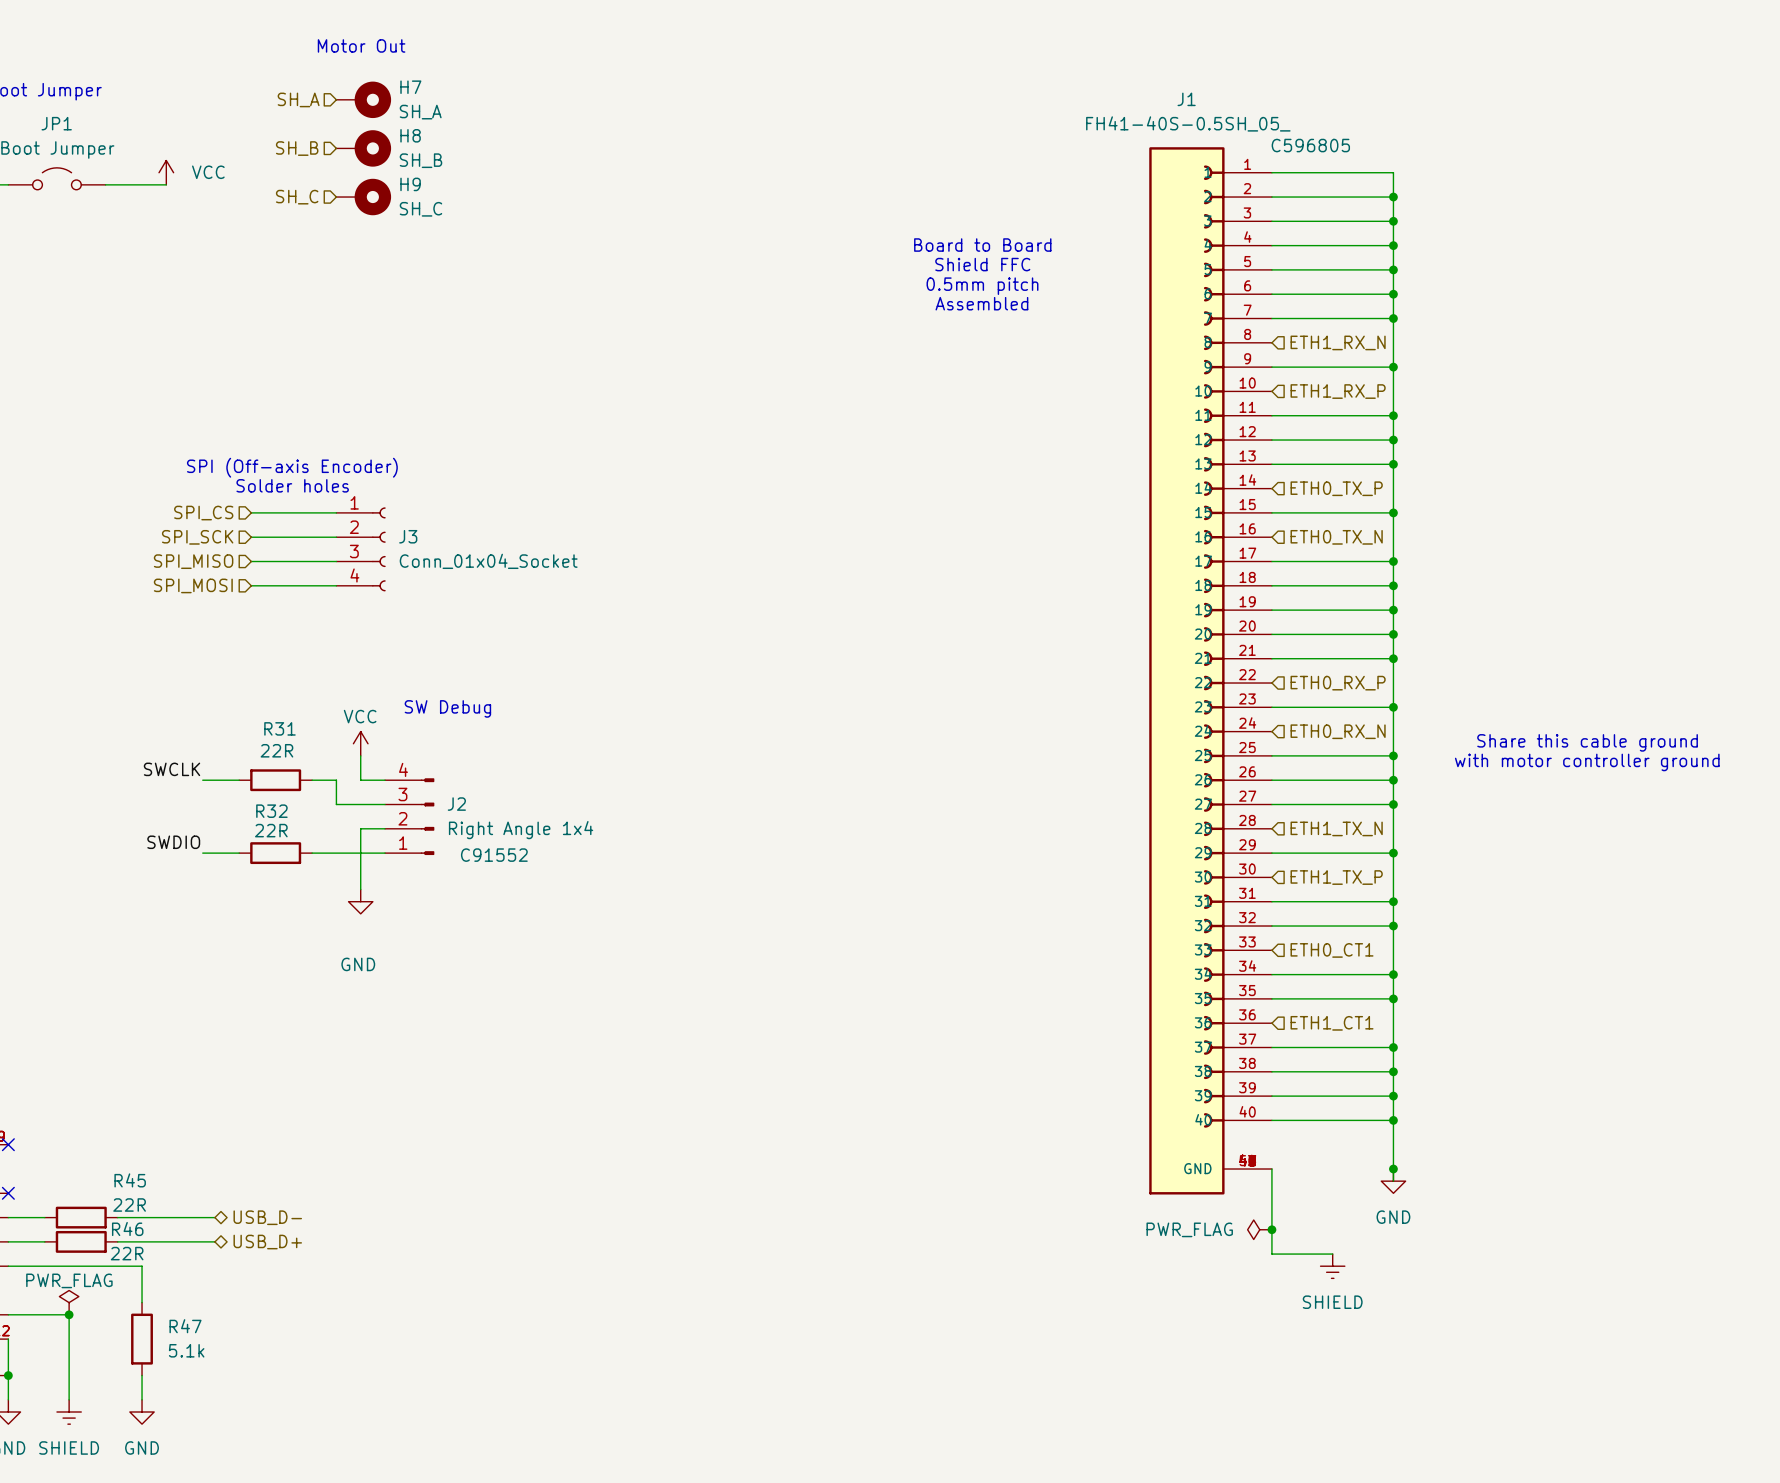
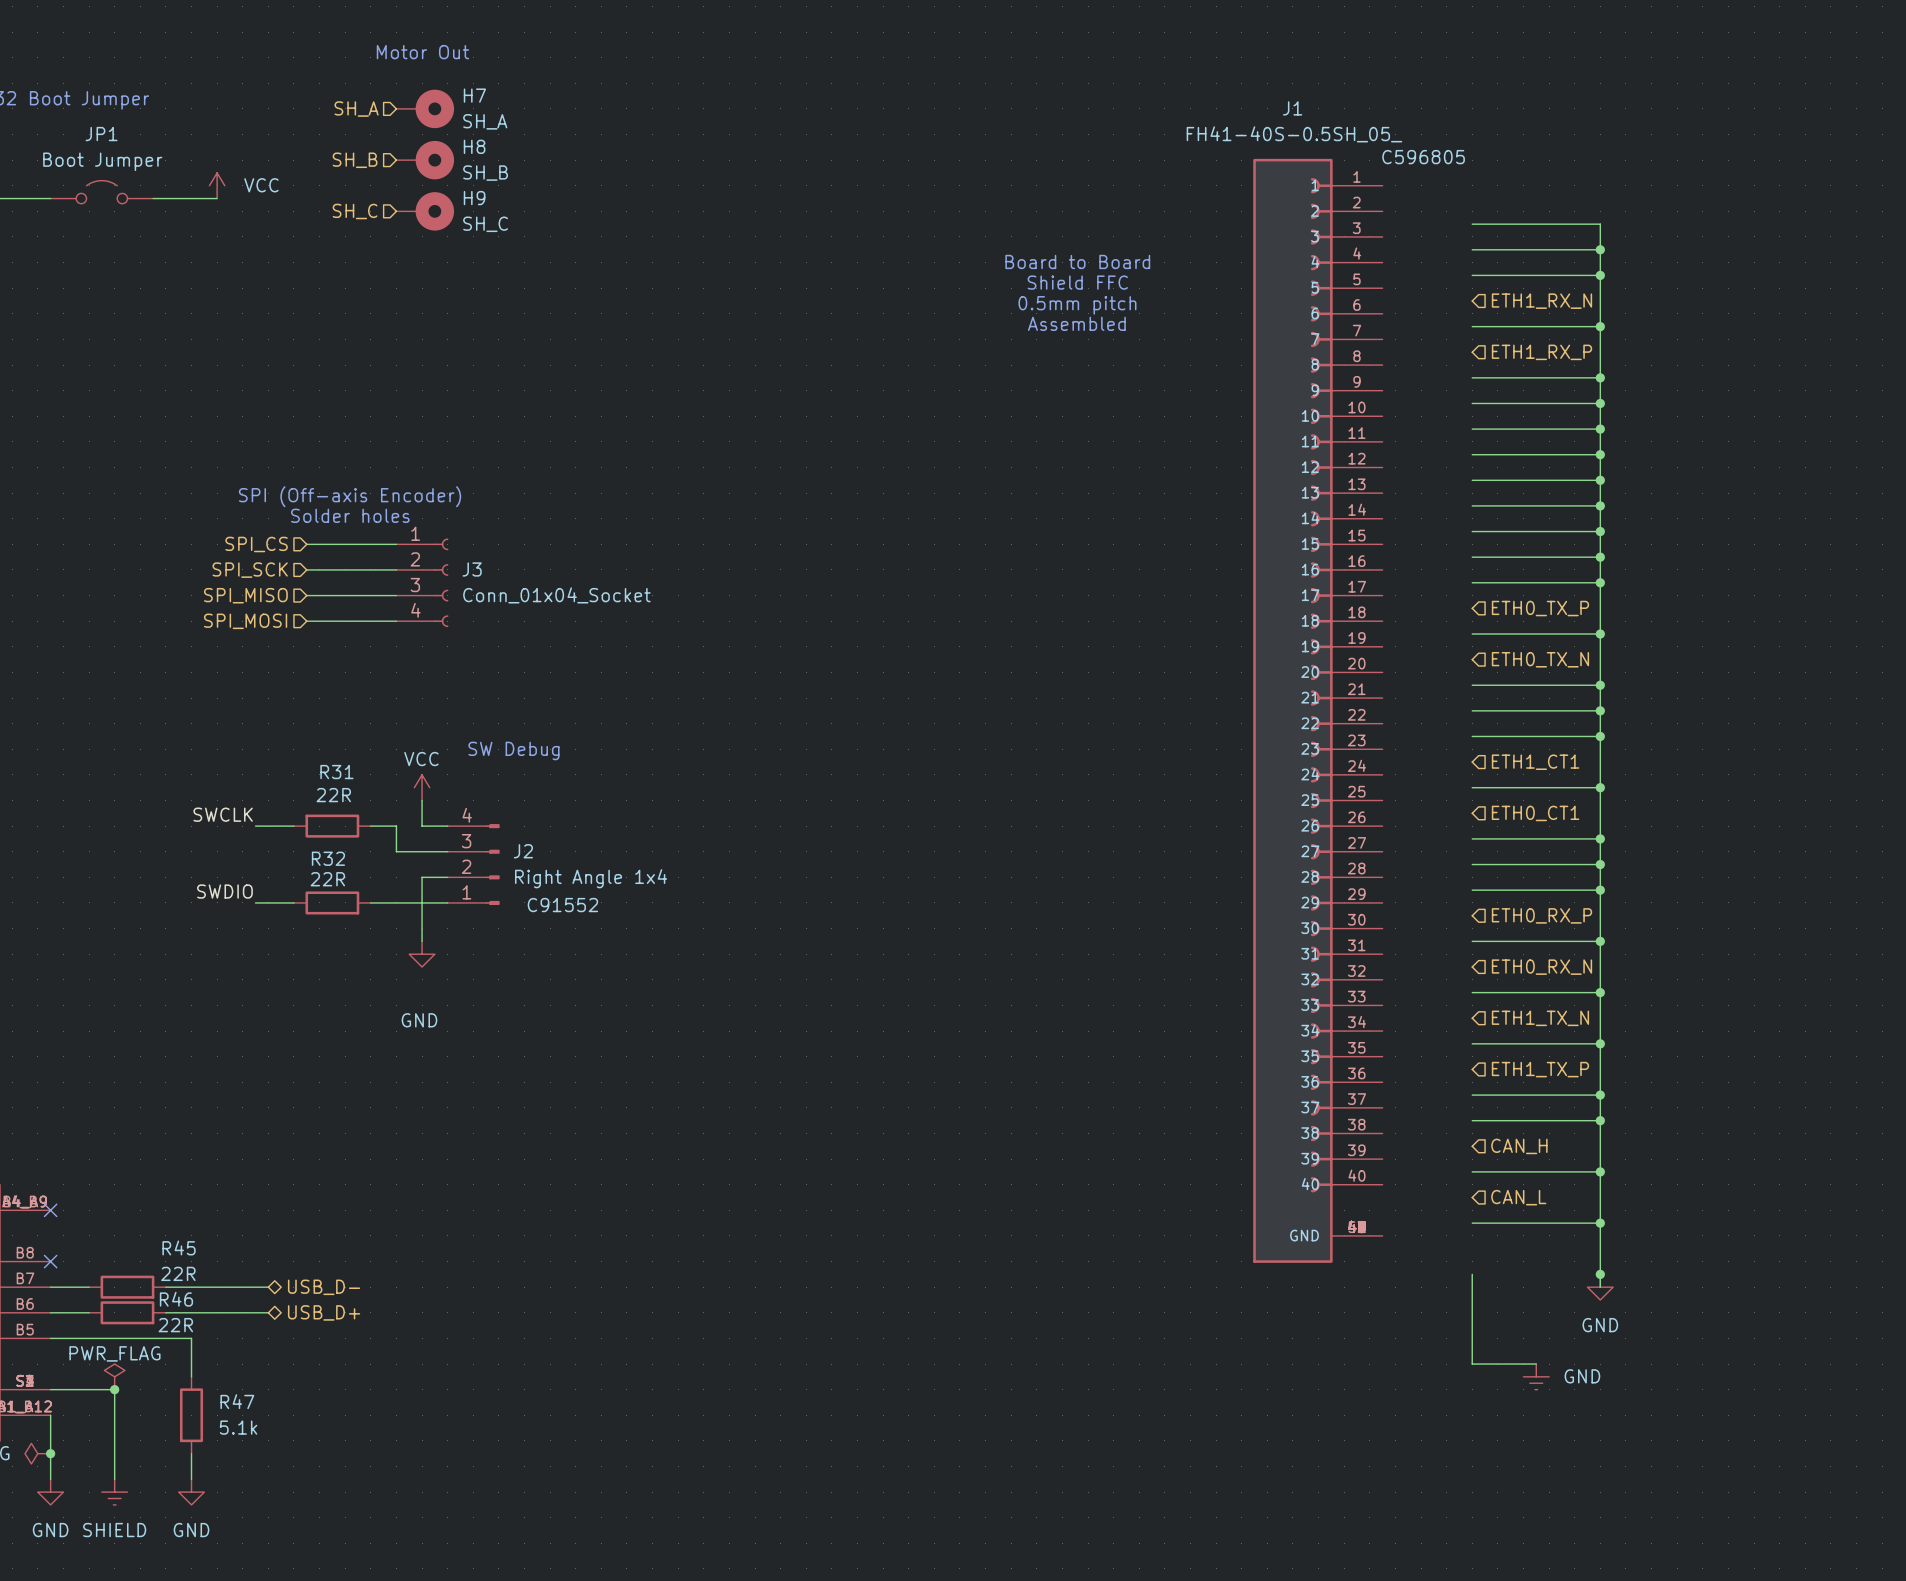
wire: (1271, 172) (1393, 172) (1393, 1181) -> (1472, 224) (1600, 224) (1600, 1287)
wire: (1271, 197) (1393, 197) -> (1472, 249) (1600, 249)
junction: (1393, 197) -> none
wire: (1271, 221) (1393, 221) -> (1472, 275) (1600, 275)
junction: (1393, 221) -> none
junction: none -> (1600, 249)
wire: (1271, 245) (1393, 245) -> (1472, 454) (1600, 454)
junction: (1393, 245) -> none
junction: none -> (1600, 275)
wire: (1271, 269) (1393, 269) -> (1472, 326) (1600, 326)
junction: (1393, 269) -> none
wire: (1271, 294) (1393, 294) -> (1472, 403) (1600, 403)
junction: (1393, 294) -> none
junction: none -> (1600, 326)
wire: (1271, 318) (1393, 318) -> (1472, 377) (1600, 377)
junction: (1393, 318) -> none
hierarchical label position: ETH1_RX_N (1338, 342) -> ETH1_RX_N (1541, 301)
junction: none -> (1600, 377)
wire: (1271, 367) (1393, 367) -> (1472, 429) (1600, 429)
junction: (1393, 367) -> none
junction: none -> (1600, 403)
hierarchical label position: ETH1_RX_P (1338, 391) -> ETH1_RX_P (1541, 352)
junction: none -> (1600, 429)
wire: (1271, 415) (1393, 415) -> (1472, 480) (1600, 480)
junction: (1393, 415) -> none
junction: none -> (1600, 454)
wire: (1271, 440) (1393, 440) -> (1472, 505) (1600, 505)
junction: (1393, 440) -> none
junction: none -> (1600, 480)
wire: (1271, 464) (1393, 464) -> (1472, 531) (1600, 531)
junction: (1393, 464) -> none
junction: none -> (1600, 505)
hierarchical label position: ETH0_TX_P (1336, 488) -> ETH0_TX_P (1540, 608)
junction: none -> (1600, 531)
wire: (1271, 512) (1393, 512) -> (1472, 582) (1600, 582)
junction: (1393, 512) -> none
junction: none -> (1600, 557)
hierarchical label position: ETH0_TX_N (1336, 537) -> ETH0_TX_N (1540, 659)
junction: none -> (1600, 582)
wire: (1271, 561) (1393, 561) -> (1472, 634) (1600, 634)
junction: (1393, 561) -> none
wire: (1271, 585) (1393, 585) -> (1472, 557) (1600, 557)
junction: (1393, 585) -> none
junction: none -> (1600, 634)
wire: (1271, 610) (1393, 610) -> (1472, 685) (1600, 685)
junction: (1393, 610) -> none
wire: (1271, 634) (1393, 634) -> (1472, 710) (1600, 710)
junction: (1393, 634) -> none
junction: none -> (1600, 685)
wire: (1271, 658) (1393, 658) -> (1472, 736) (1600, 736)
junction: (1393, 658) -> none
junction: none -> (1600, 710)
hierarchical label position: ETH0_RX_P (1338, 683) -> ETH0_RX_P (1541, 915)
junction: none -> (1600, 736)
wire: (1271, 707) (1393, 707) -> (1472, 787) (1600, 787)
junction: (1393, 707) -> none
hierarchical label: none -> ETH1_CT1 (1535, 762)
hierarchical label position: ETH0_RX_N (1338, 731) -> ETH0_RX_N (1541, 967)
text: Share this cable ground (1587, 742) -> none
junction: none -> (1600, 787)
wire: (1271, 755) (1393, 755) -> (1472, 838) (1600, 838)
junction: (1393, 755) -> none
text: with motor controller ground (1587, 762) -> none
wire: (1271, 780) (1393, 780) -> (1472, 864) (1600, 864)
junction: (1393, 780) -> none
junction: none -> (1600, 838)
wire: (1271, 804) (1393, 804) -> (1472, 890) (1600, 890)
junction: (1393, 804) -> none
junction: none -> (1600, 864)
hierarchical label position: ETH1_TX_N (1336, 828) -> ETH1_TX_N (1540, 1018)
junction: none -> (1600, 890)
wire: (1271, 853) (1393, 853) -> (1472, 941) (1600, 941)
junction: (1393, 853) -> none
hierarchical label position: ETH1_TX_P (1336, 877) -> ETH1_TX_P (1540, 1069)
junction: none -> (1600, 941)
wire: (1271, 901) (1393, 901) -> (1472, 992) (1600, 992)
junction: (1393, 901) -> none
wire: (1271, 926) (1393, 926) -> none
junction: (1393, 926) -> none
junction: none -> (1600, 992)
hierarchical label position: ETH0_CT1 (1332, 950) -> ETH0_CT1 (1535, 813)
wire: (1271, 974) (1393, 974) -> (1472, 1120) (1600, 1120)
junction: (1393, 974) -> none
junction: none -> (1600, 1043)
wire: (1271, 998) (1393, 998) -> (1472, 1095) (1600, 1095)
junction: (1393, 998) -> none
hierarchical label: ETH1_CT1 (1332, 1023) -> none
junction: none -> (1600, 1095)
wire: (1271, 1047) (1393, 1047) -> (1472, 1043) (1600, 1043)
junction: (1393, 1047) -> none
junction: none -> (1600, 1120)
wire: (1271, 1071) (1393, 1071) -> (1472, 1171) (1600, 1171)
junction: (1393, 1071) -> none
hierarchical label: none -> CAN_H (1519, 1146)
wire: (1271, 1096) (1393, 1096) -> none
junction: (1393, 1096) -> none
junction: none -> (1600, 1171)
wire: (1271, 1120) (1393, 1120) -> (1472, 1223) (1600, 1223)
junction: (1393, 1120) -> none
hierarchical label: none -> CAN_L (1518, 1197)
junction: none -> (1600, 1223)
wire: (1271, 1169) (1271, 1254) (1332, 1254) -> (1472, 1274) (1472, 1364) (1536, 1364)
junction: (1393, 1169) -> none
power symbol position: GND (1393, 1181) -> GND (1600, 1287)
junction: none -> (1600, 1274)
power symbol: PWR_FLAG (1259, 1229) -> none
junction: (1271, 1229) -> none
power symbol: SHIELD (1332, 1266) -> none
power symbol: none -> GND (1536, 1376)

